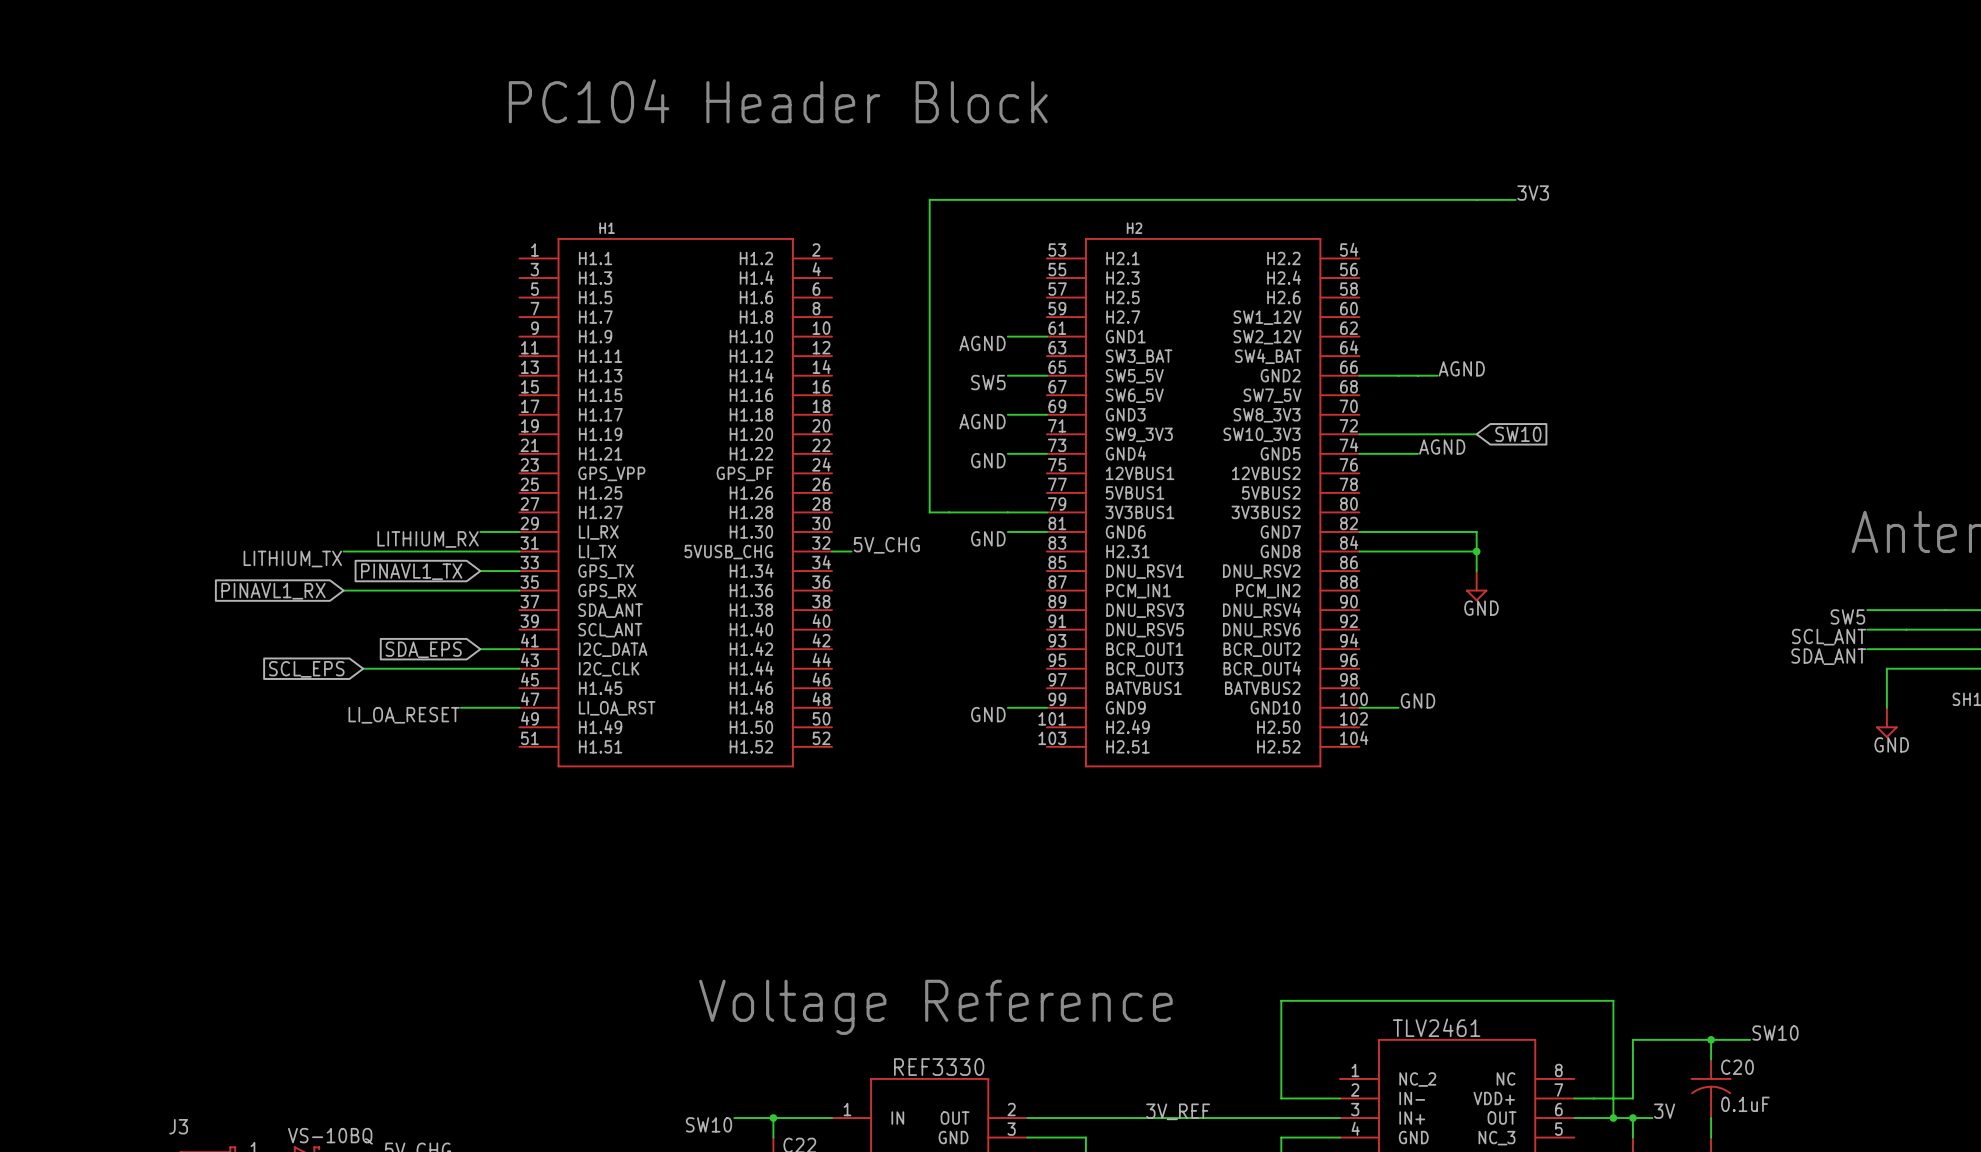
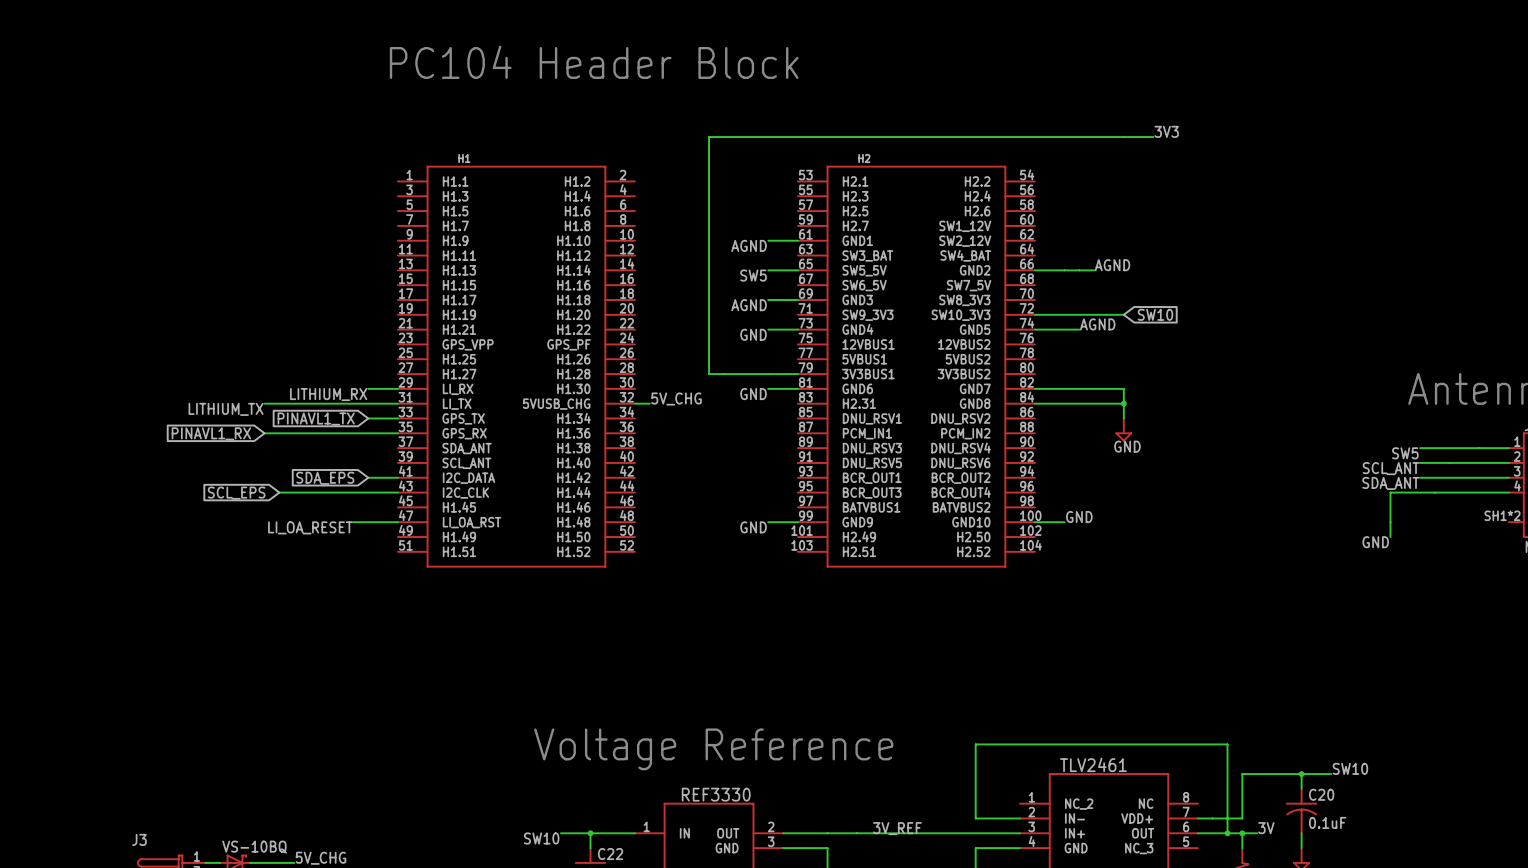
wire: (1886, 668) (1886, 707) -> (1434, 492) (1390, 492) (1390, 537)
power symbol: GND (1886, 722) -> none
label: none -> GND (1375, 542)

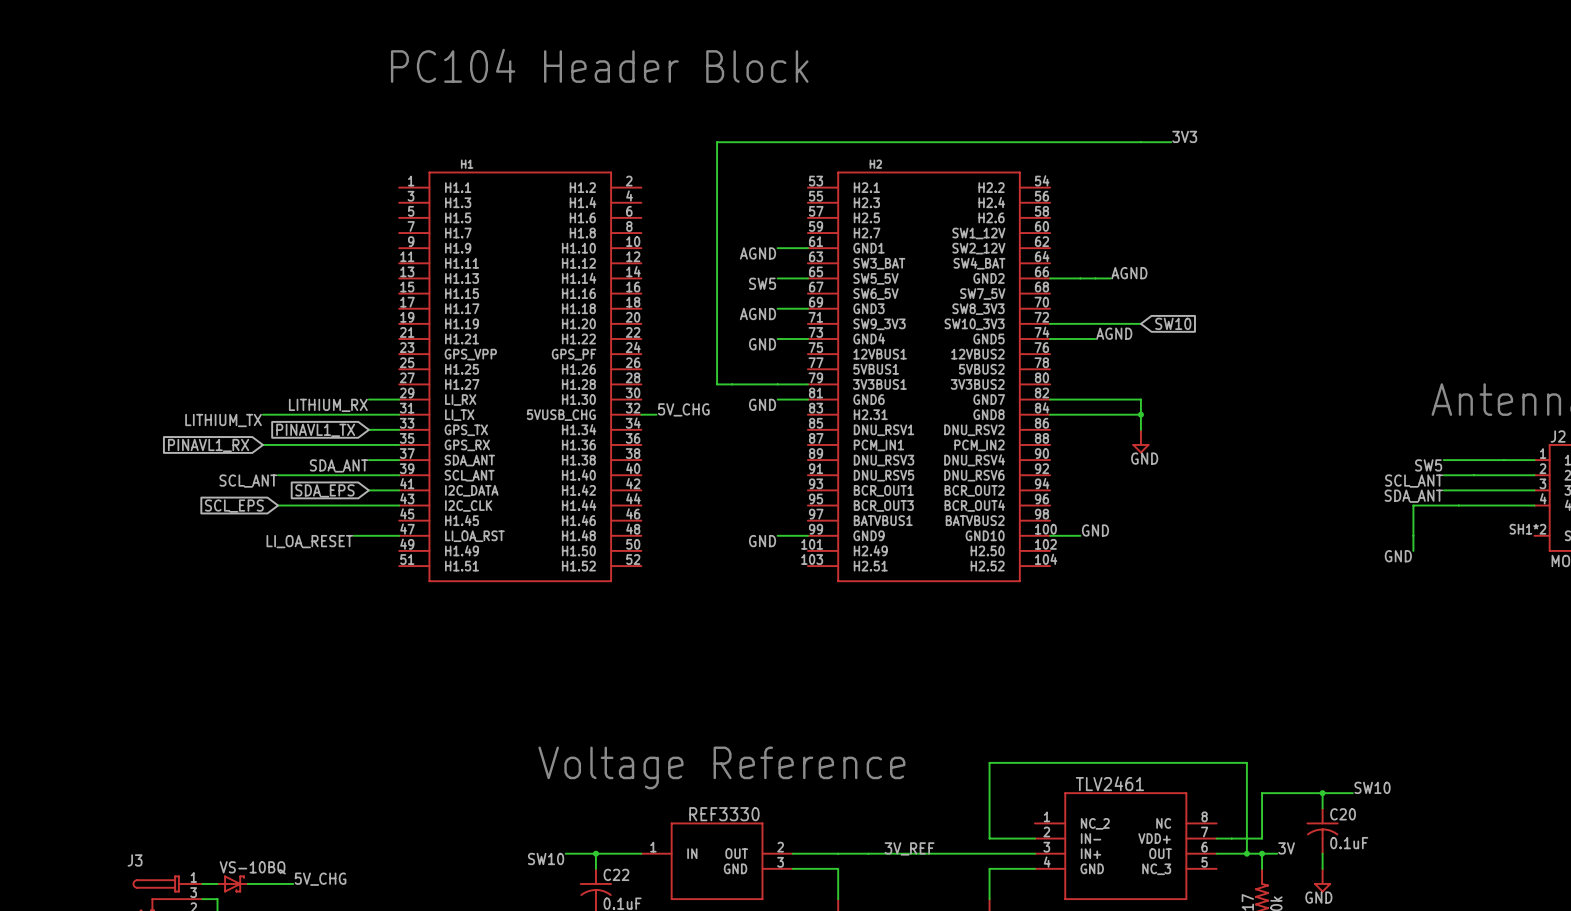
wire: none -> (368, 460) (399, 460)
label: none -> SDA_ANT (339, 465)
wire: none -> (278, 475) (399, 475)
label: none -> SCL_ANT (248, 481)

